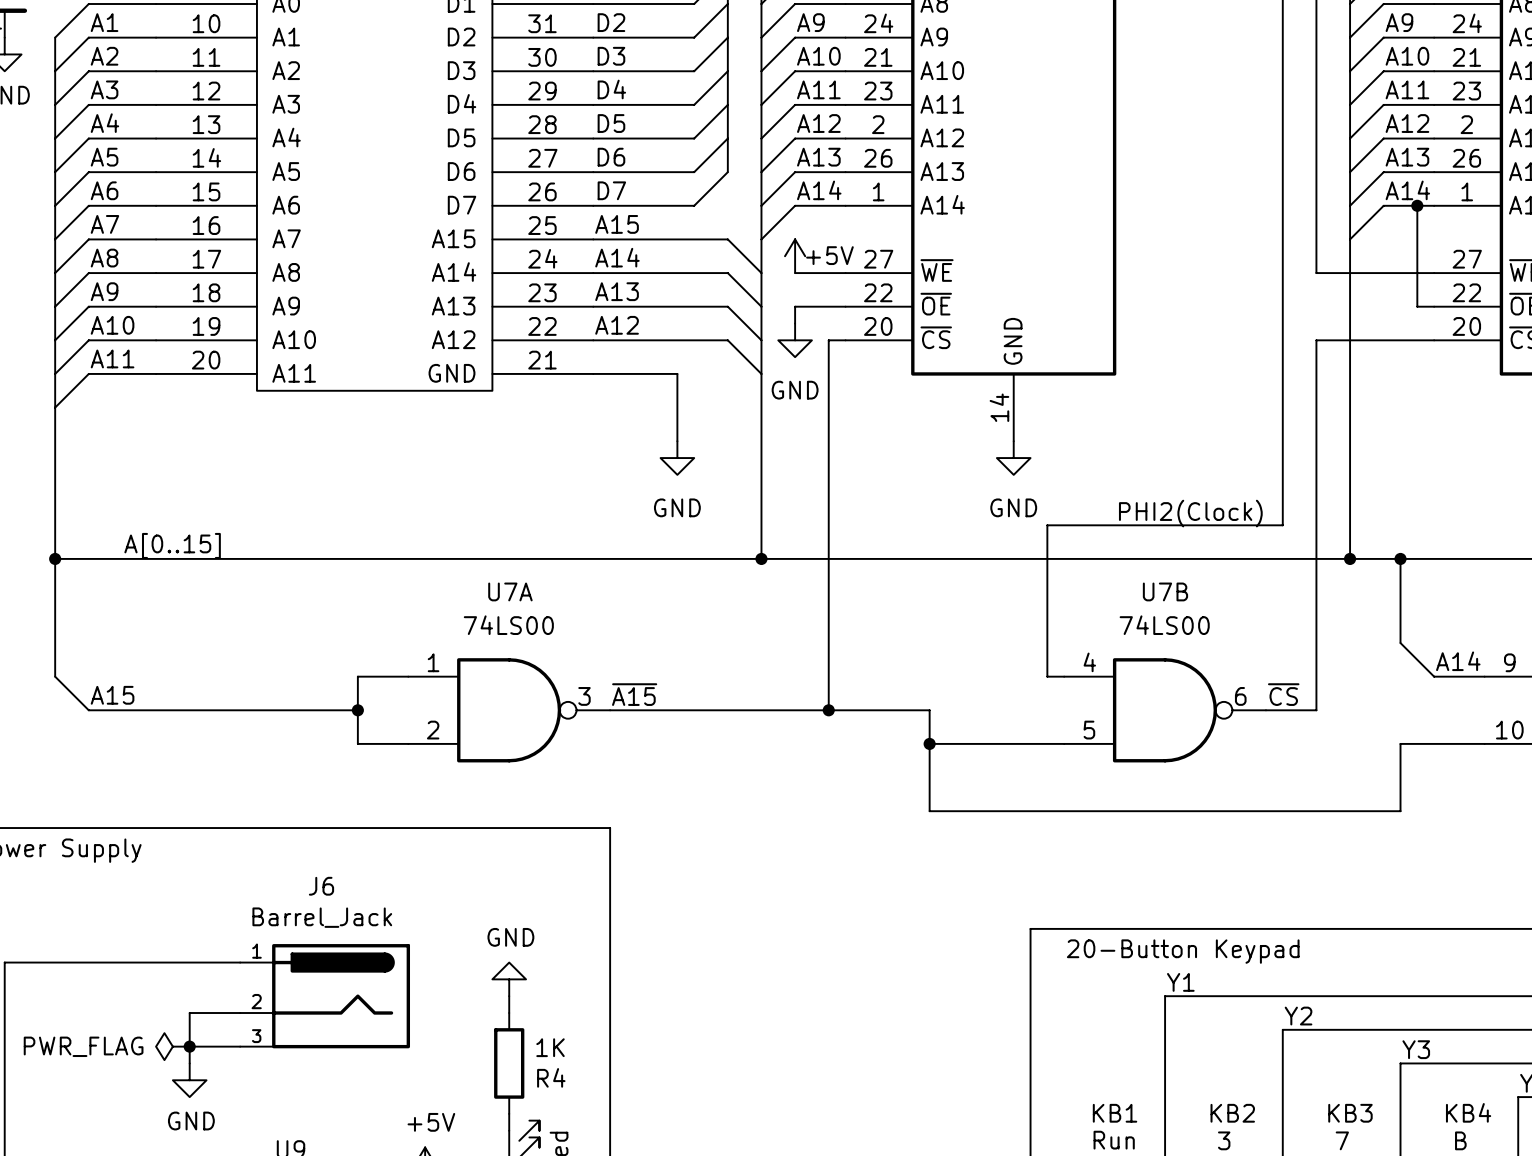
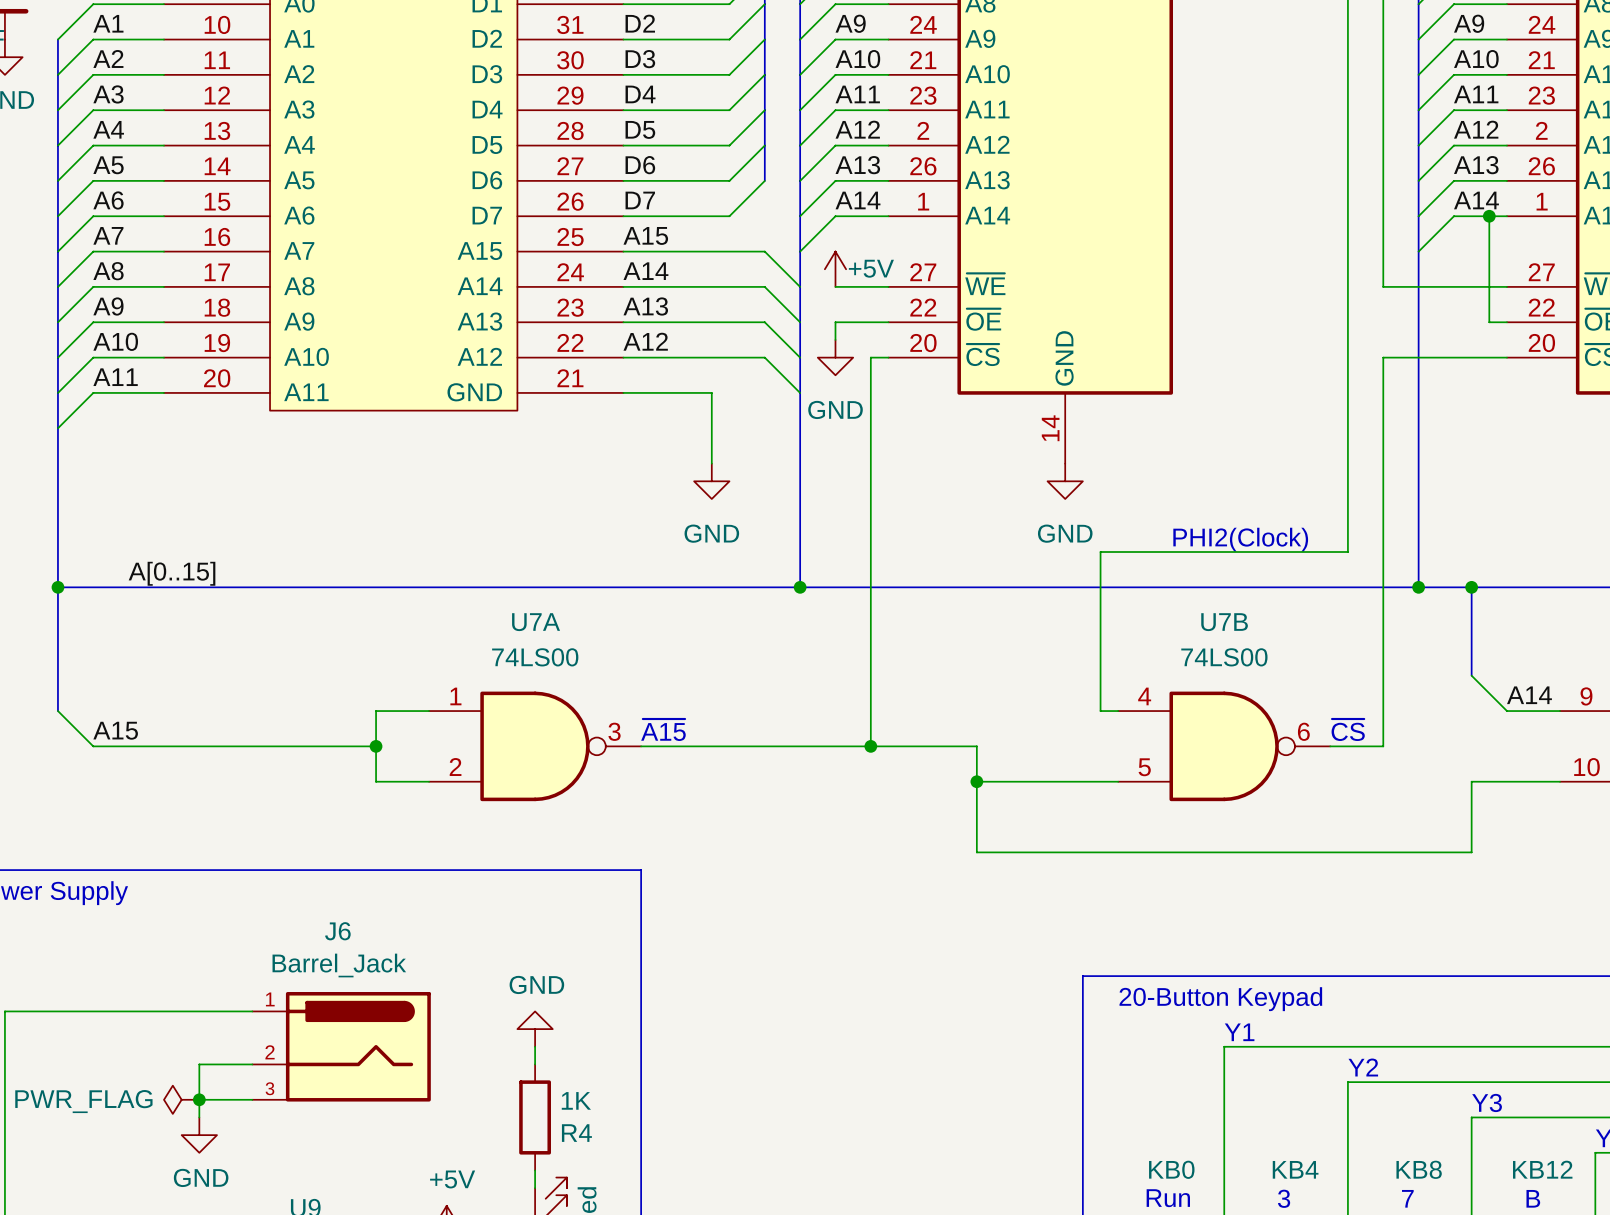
KB4 name: KB4 (1468, 1112) -> KB12 (1542, 1169)
KB1 name: KB1 (1115, 1113) -> KB0 (1171, 1169)
KB2 name: KB2 (1232, 1113) -> KB4 (1295, 1169)
KB3 name: KB3 (1350, 1113) -> KB8 (1419, 1169)

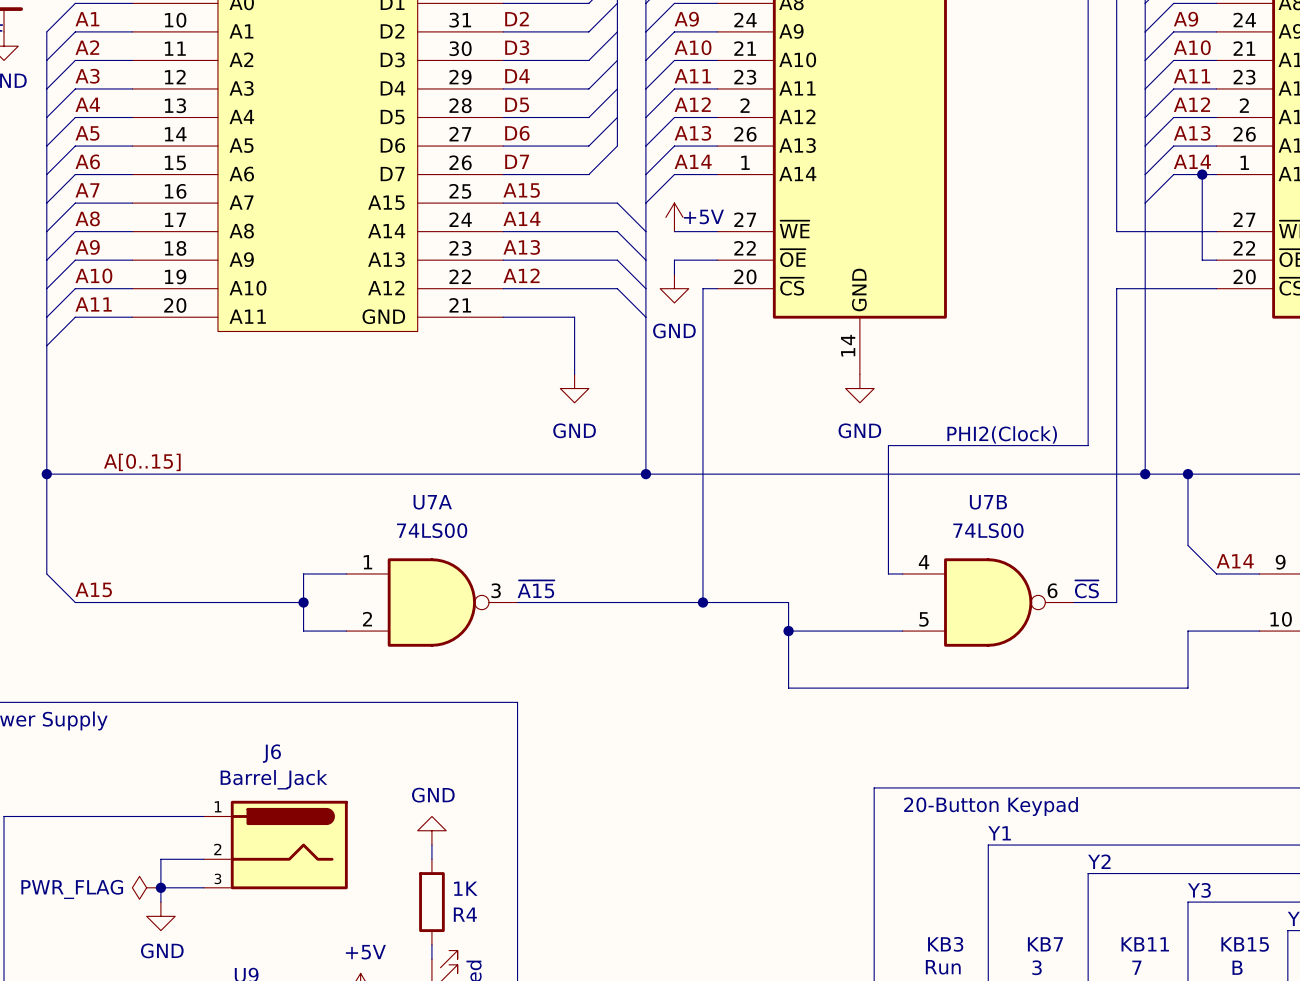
KB0 name: KB0 (1171, 1169) -> KB3 (945, 944)
KB4 name: KB4 (1295, 1169) -> KB7 (1045, 944)
KB8 name: KB8 (1419, 1169) -> KB11 (1145, 944)
KB12 name: KB12 (1542, 1169) -> KB15 (1245, 944)

